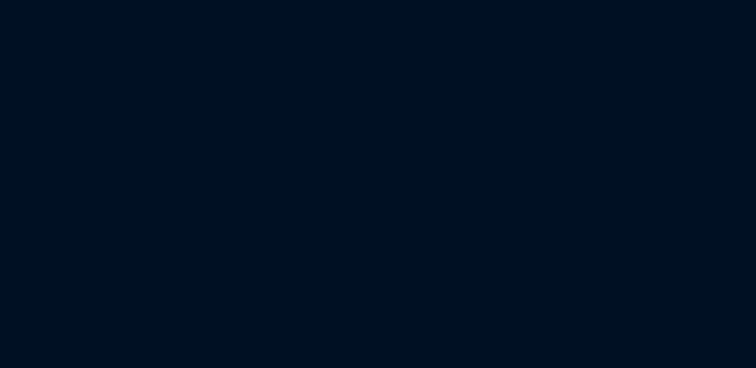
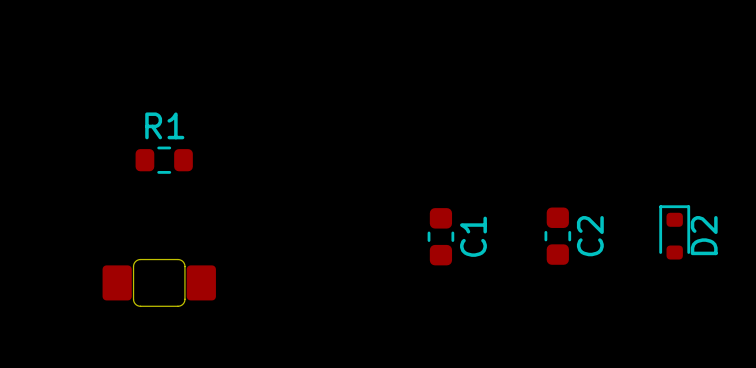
R1: none -> (164, 160)
D2: none -> (674, 232)
C1: none -> (440, 236)
C2: none -> (557, 236)
part: none -> (159, 282)

